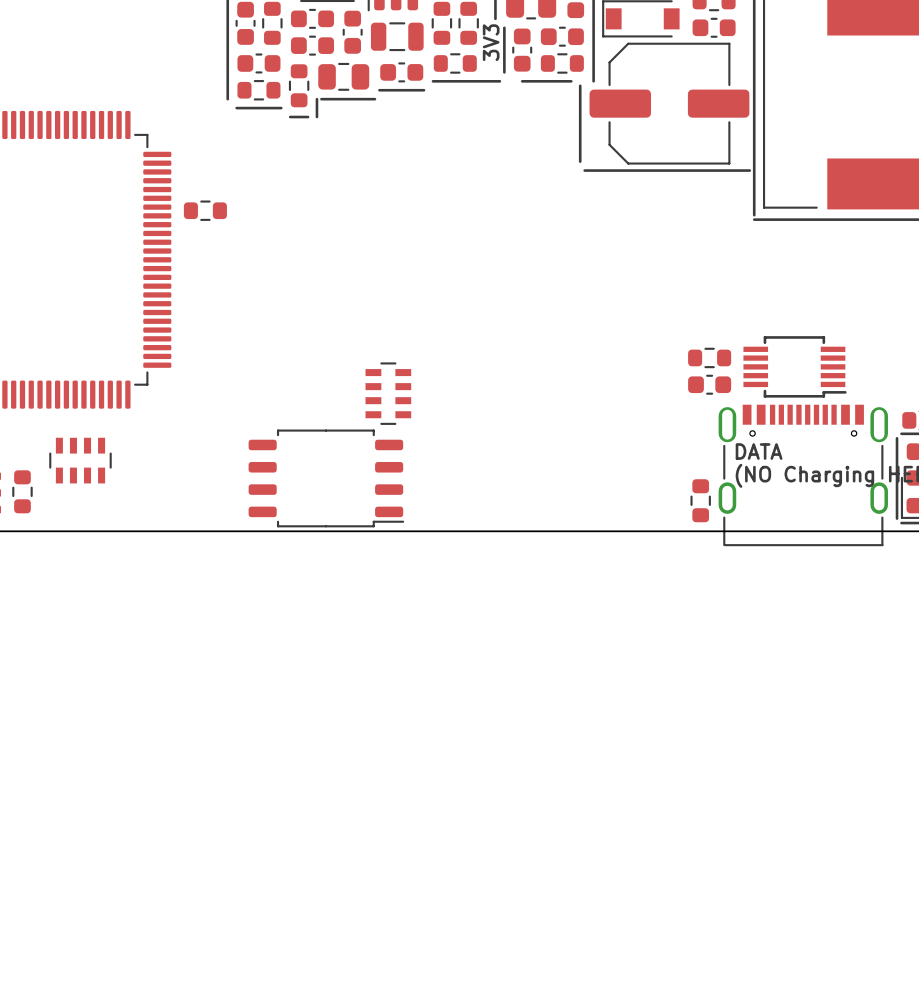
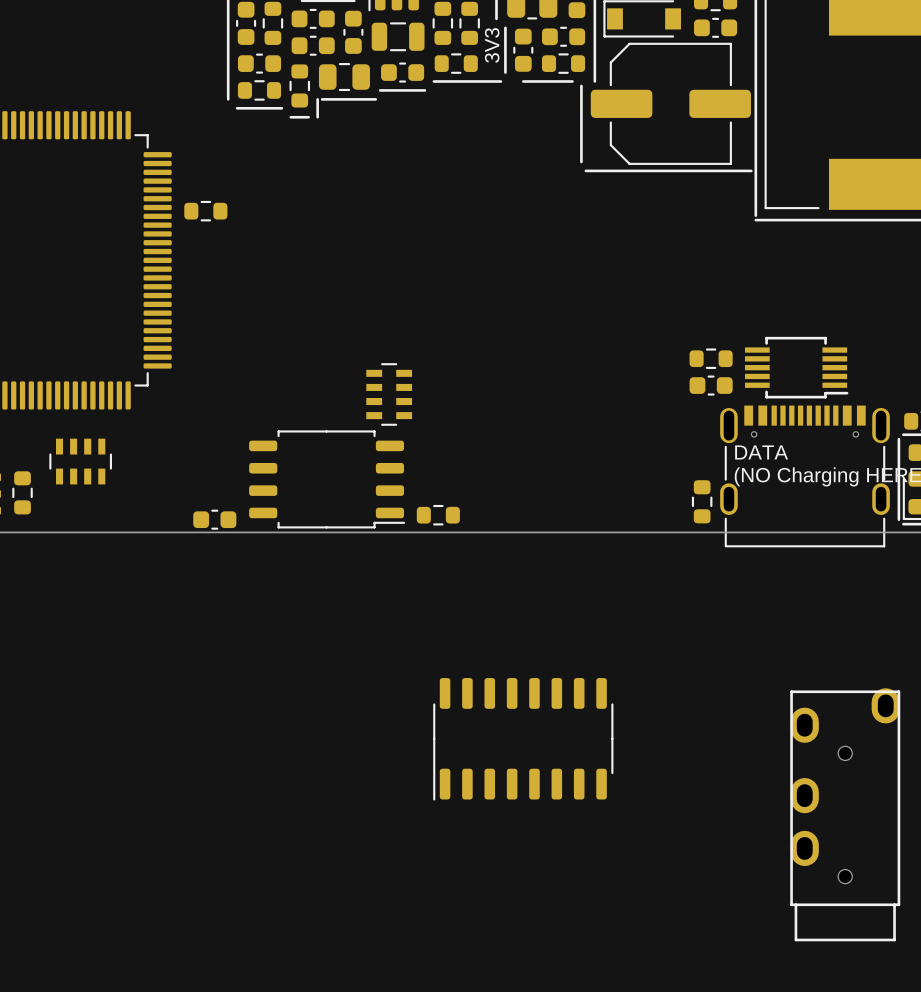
part: none -> (438, 515)
part: none -> (214, 519)
part: none -> (523, 739)
part: none -> (845, 814)

